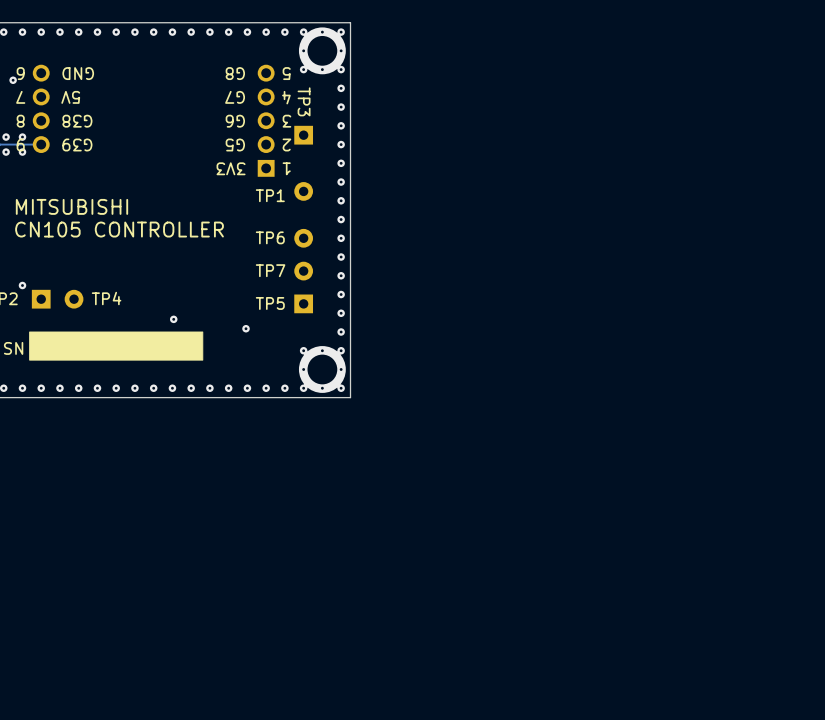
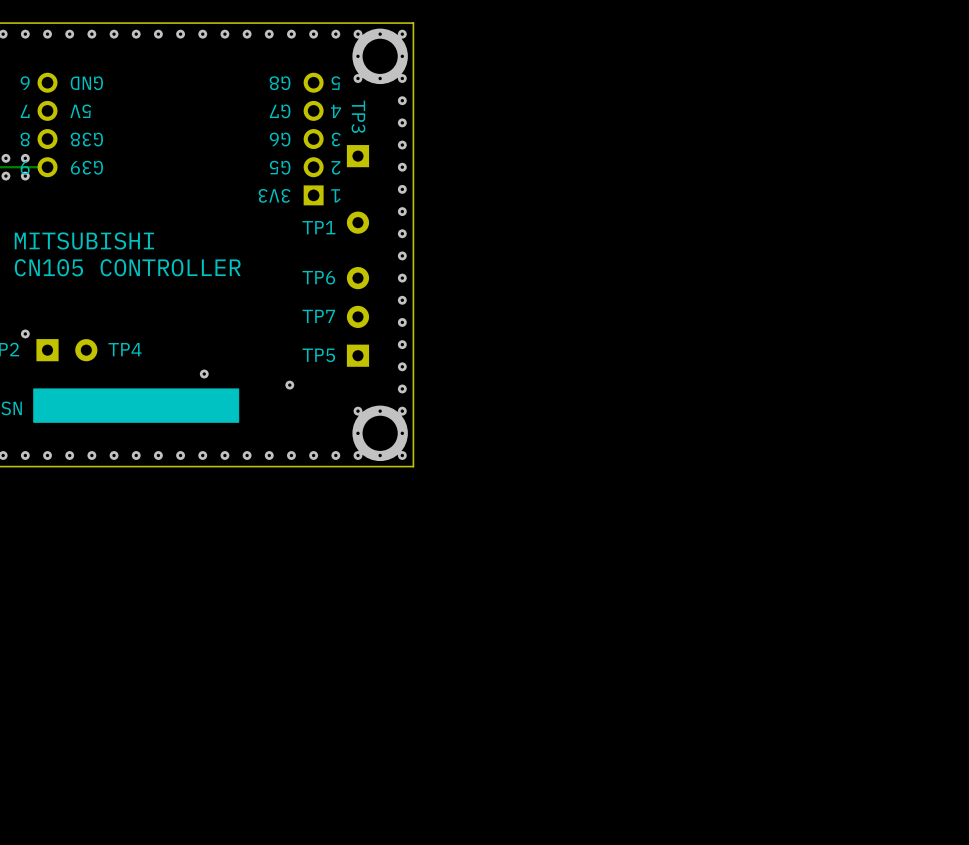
via: (13, 80) -> none

